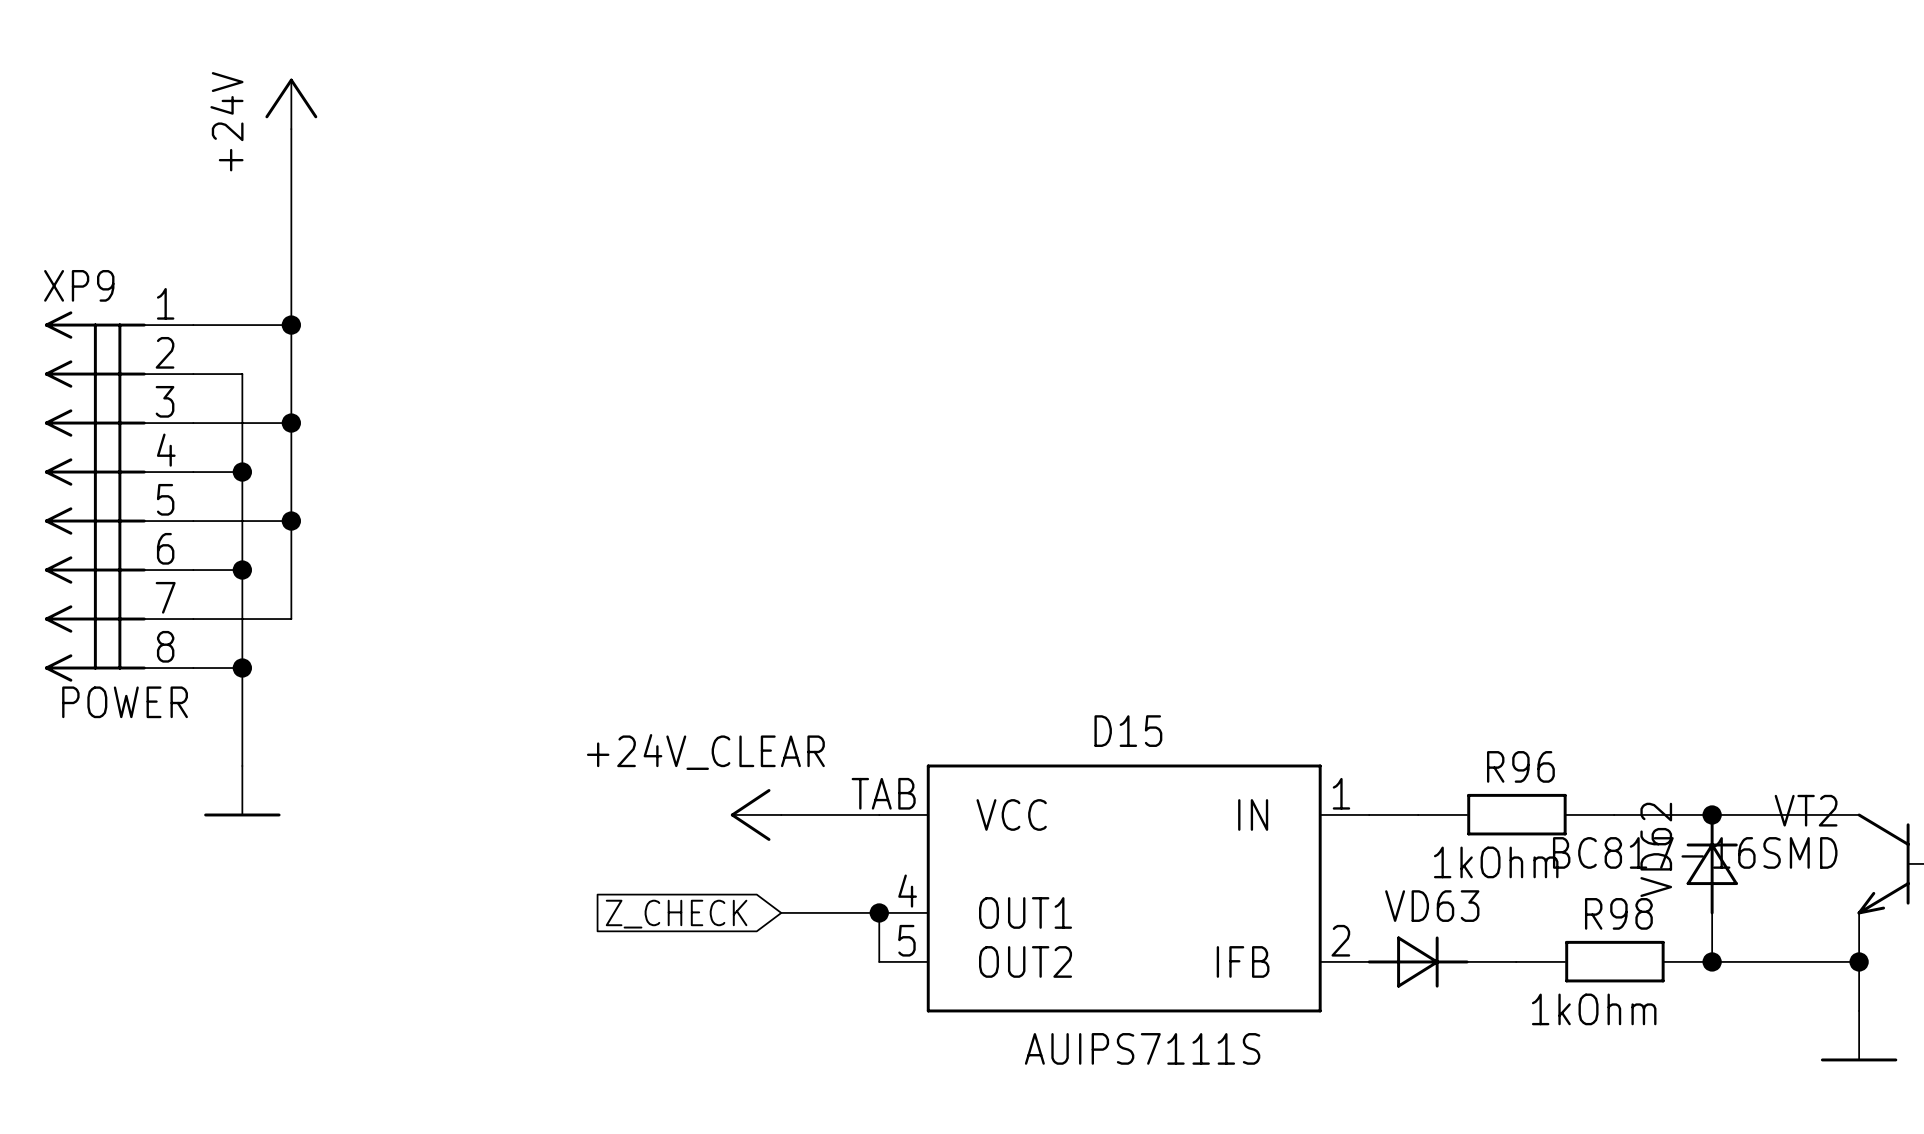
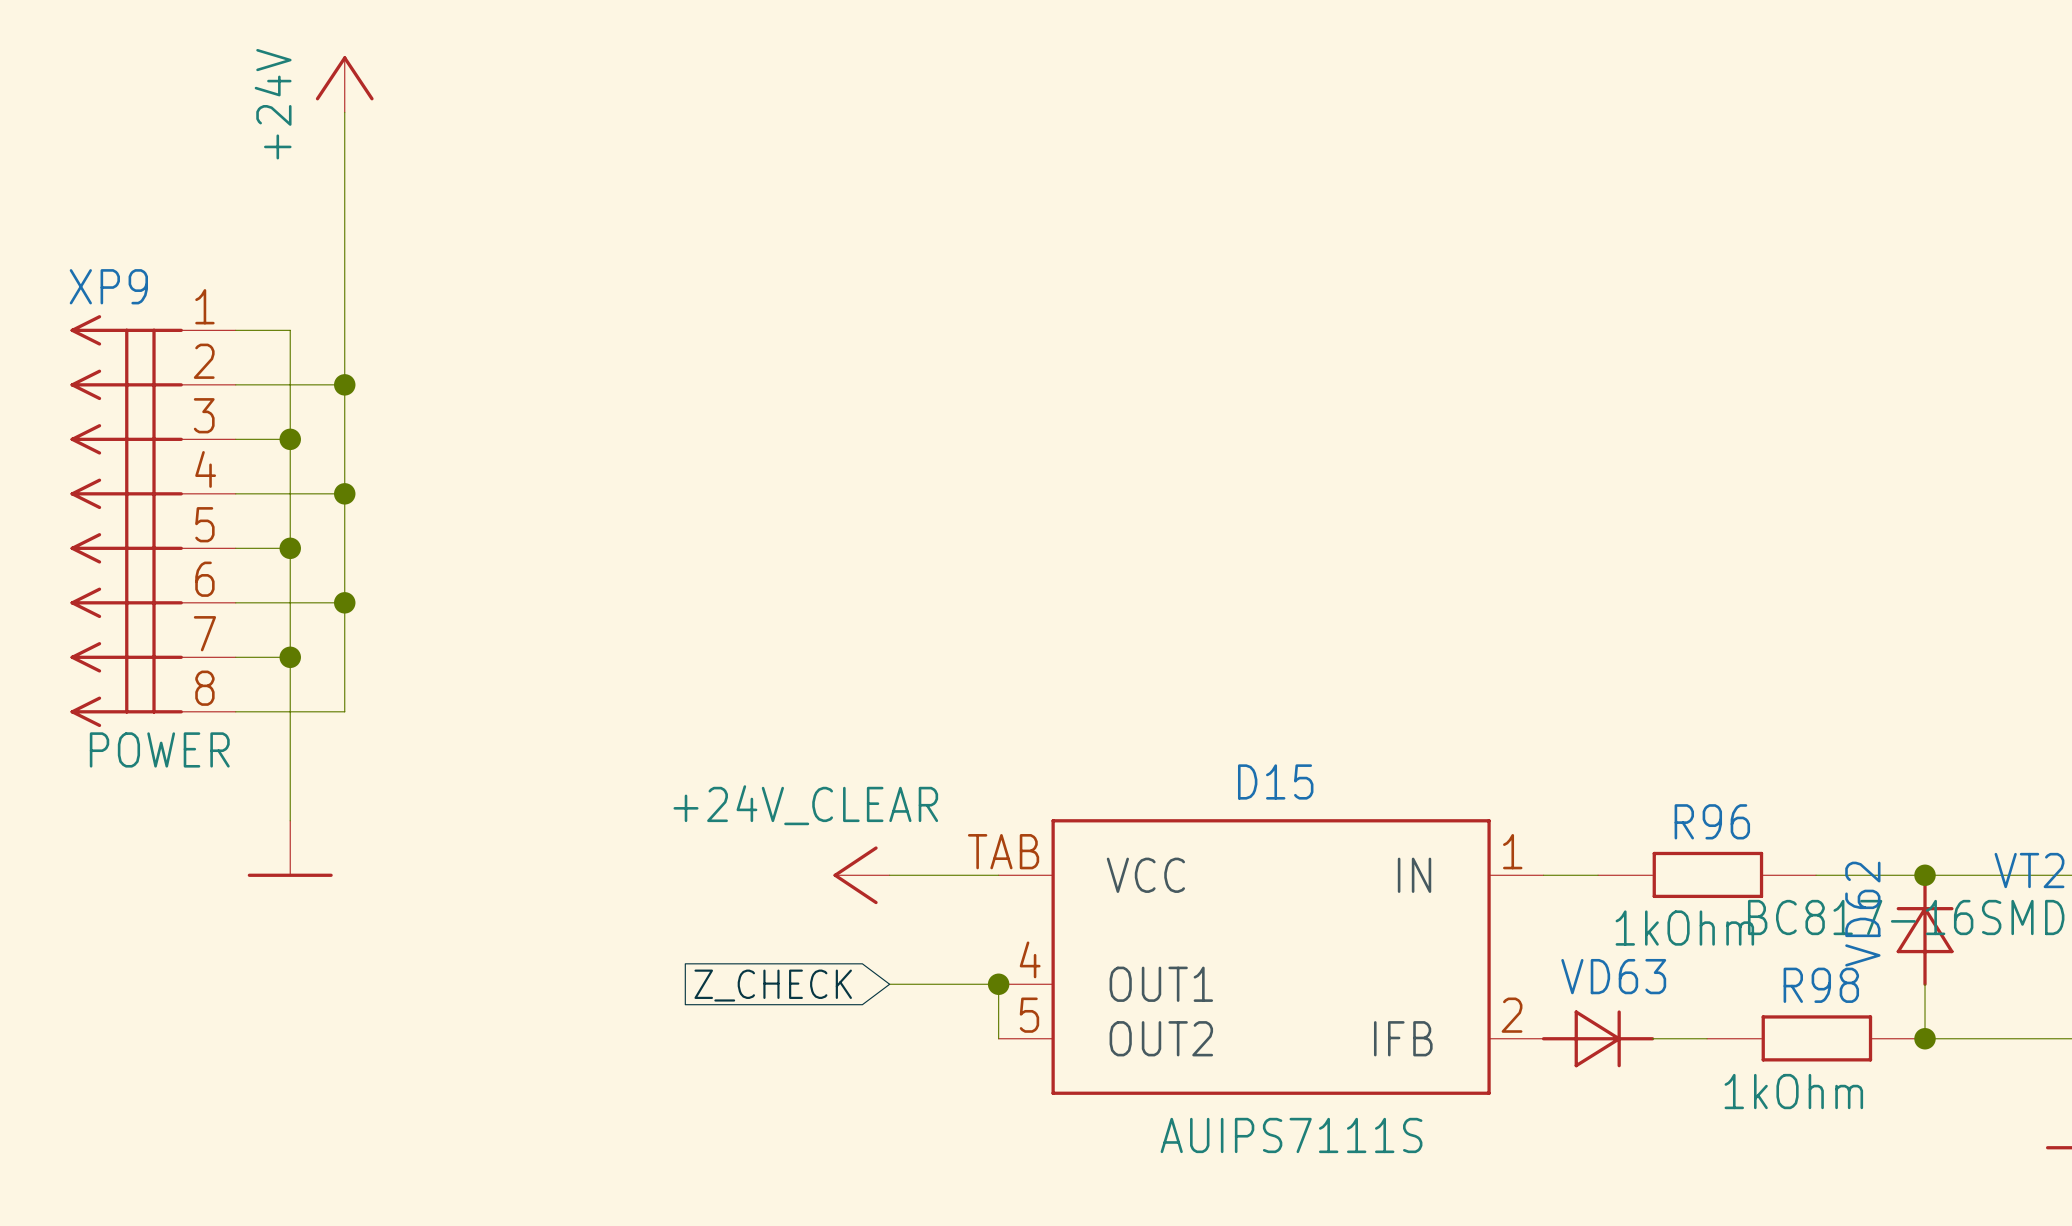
wire: (242, 325) (291, 325) -> (290, 330) (290, 384) (344, 384)
junction: (291, 325) -> none
junction: none -> (344, 384)
wire: (242, 423) (291, 423) -> (290, 493) (344, 493)
junction: none -> (290, 439)
junction: (291, 423) -> none
junction: (242, 472) -> none
junction: none -> (344, 493)
wire: (242, 521) (291, 521) -> (290, 602) (344, 602)
junction: none -> (290, 548)
junction: (291, 521) -> none
junction: (242, 570) -> none
junction: none -> (344, 602)
wire: (242, 619) (291, 619) -> (290, 711) (344, 711) (344, 657)
junction: none -> (290, 657)
junction: (242, 668) -> none

